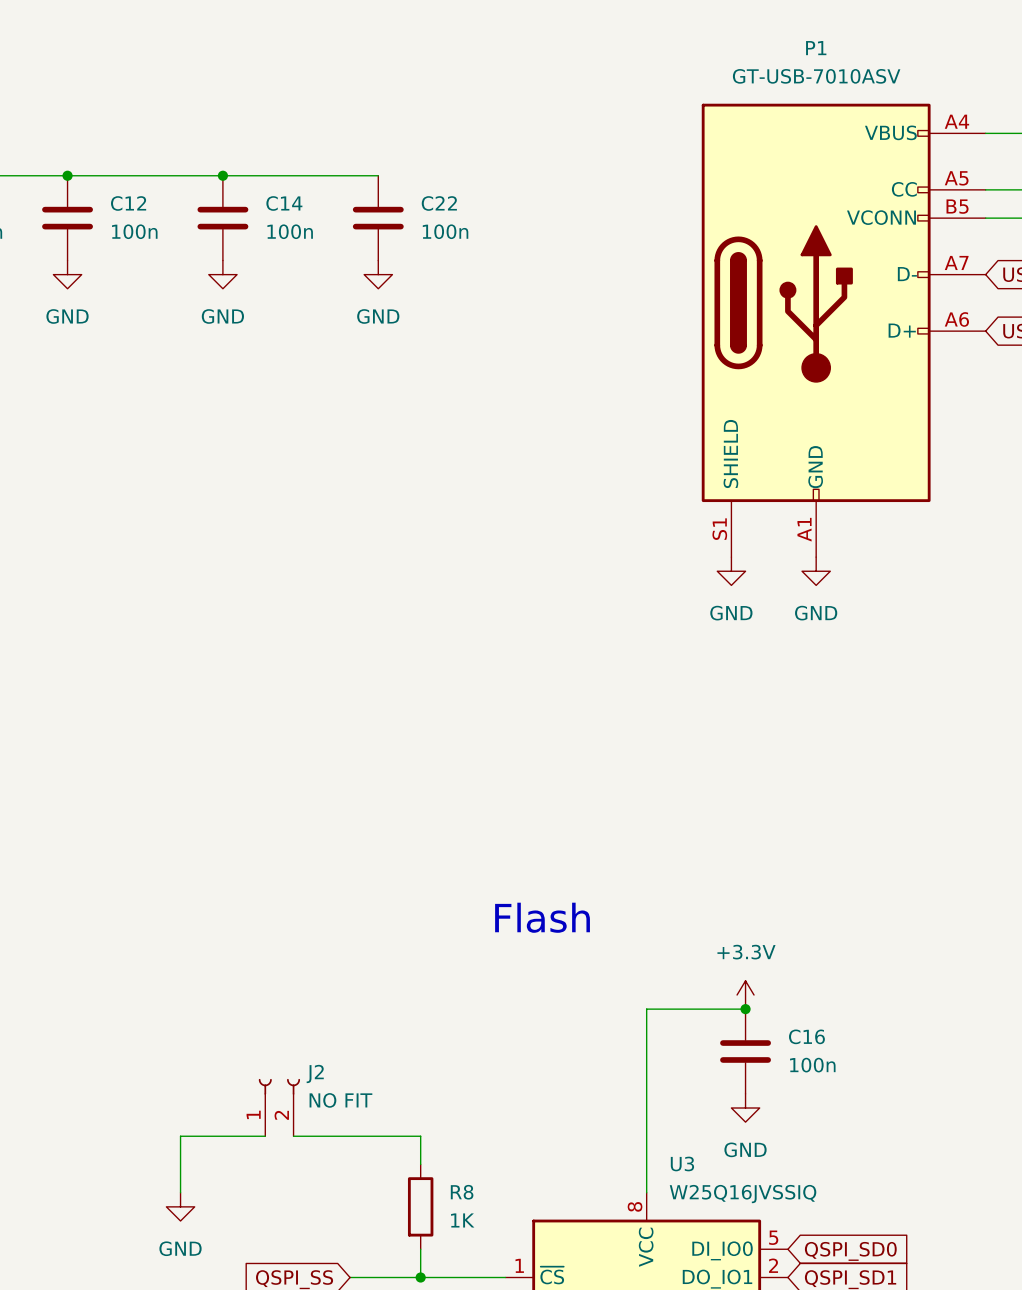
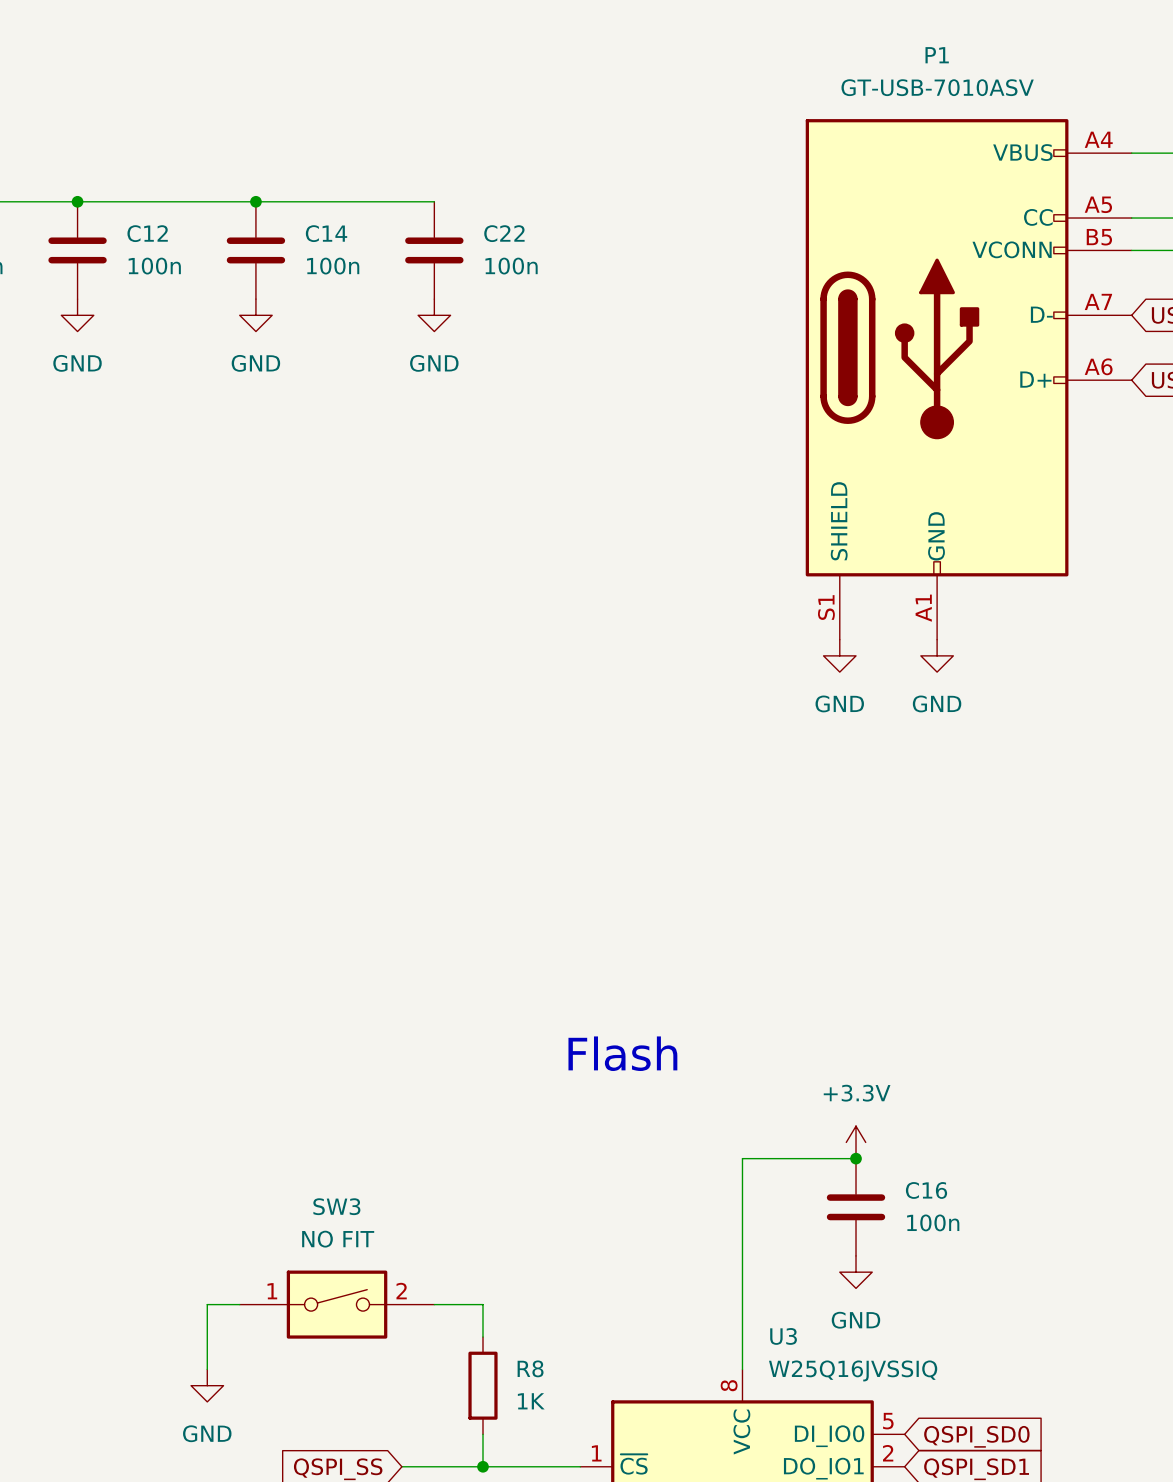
J2: NO FIT (279, 1107) -> none
SW3: none -> NO FIT (337, 1304)

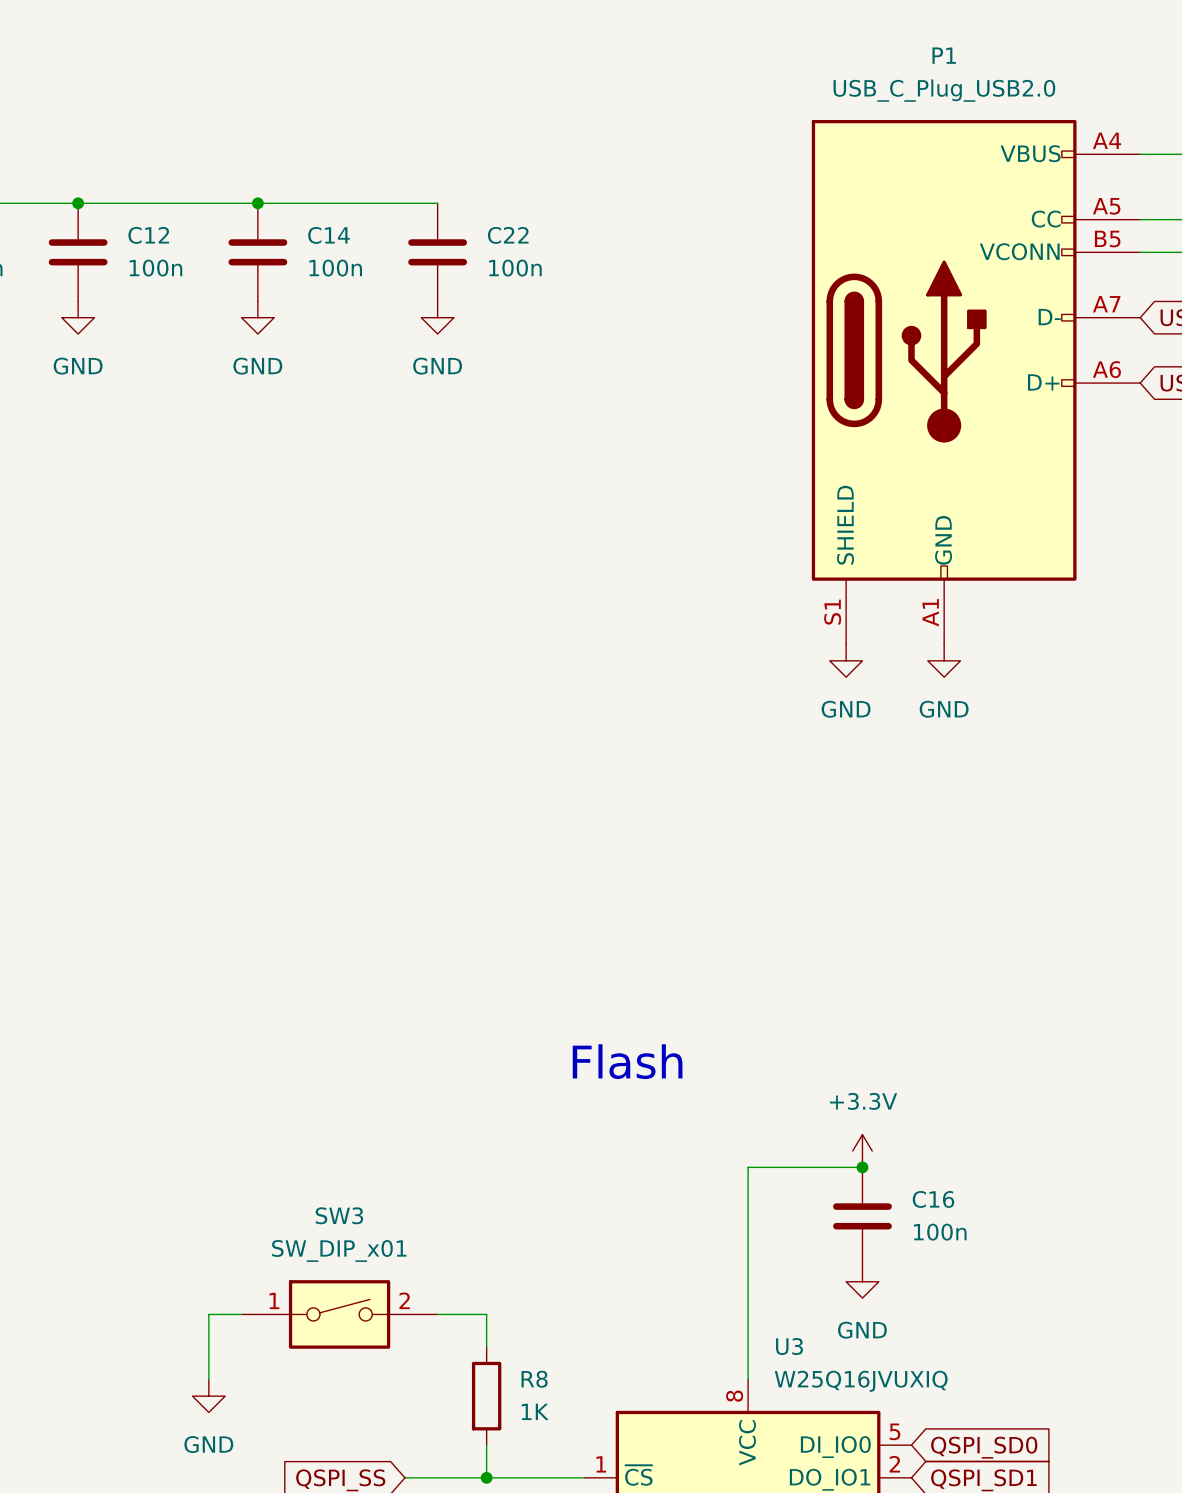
P1 value: GT-USB-7010ASV (937, 87) -> USB_C_Plug_USB2.0 (944, 90)
SW3 value: NO FIT (338, 1239) -> SW_DIP_x01 (339, 1250)
U3 value: W25Q16JVSSIQ (853, 1370) -> W25Q16JVUXIQ (861, 1381)

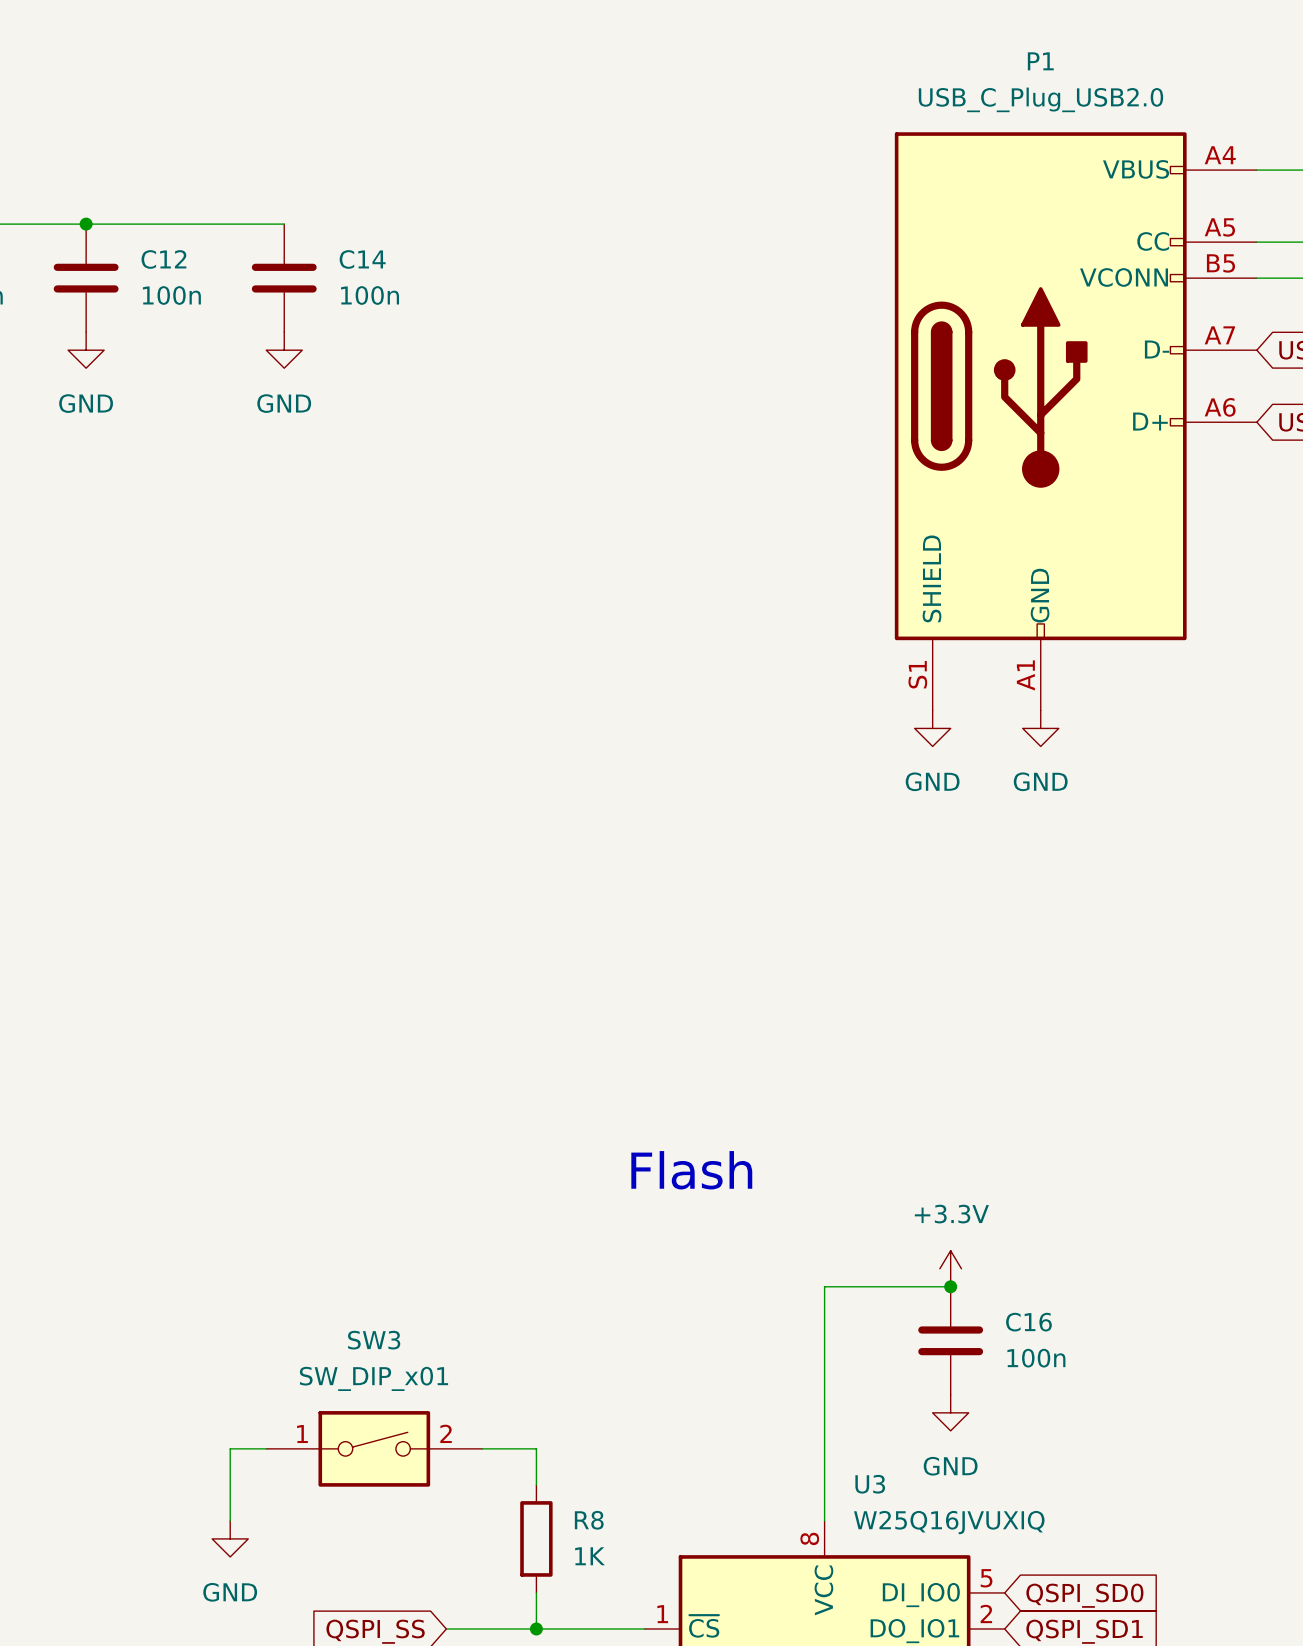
wire: (257, 203) (437, 203) -> none
junction: (257, 203) -> none
C22: 100n (437, 252) -> none
power symbol: GND (437, 317) -> none

